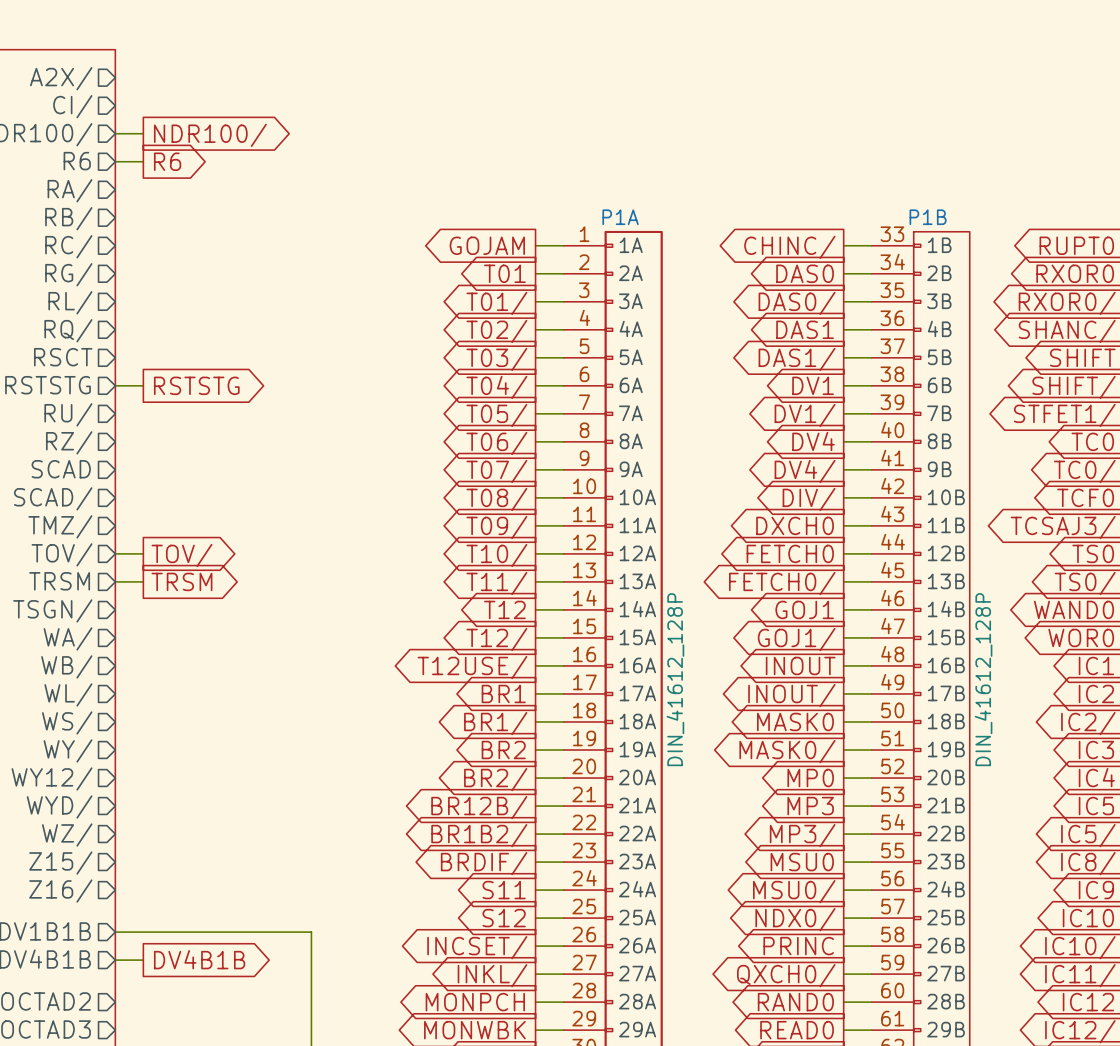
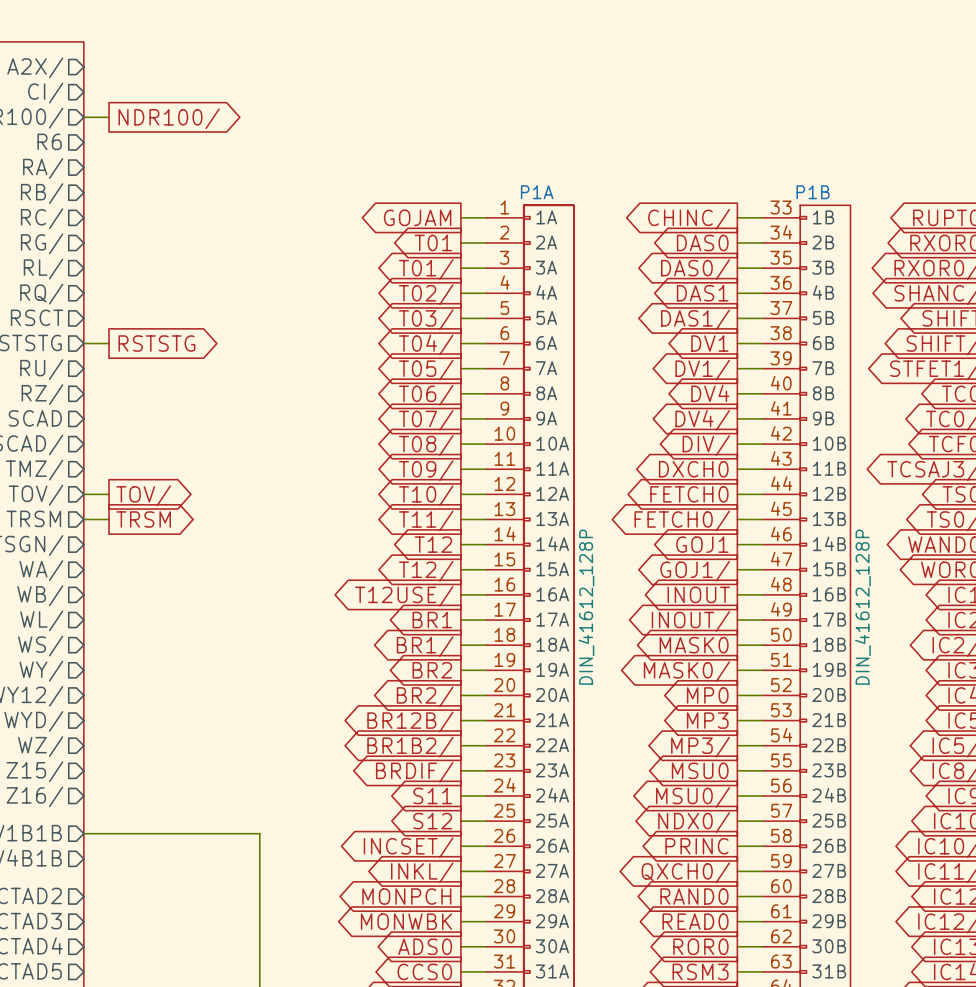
wire: (115, 161) (143, 161) -> none
global label: R6 (167, 161) -> none
global label: DV4B1B (199, 959) -> none
wire: (115, 960) (143, 960) -> none

